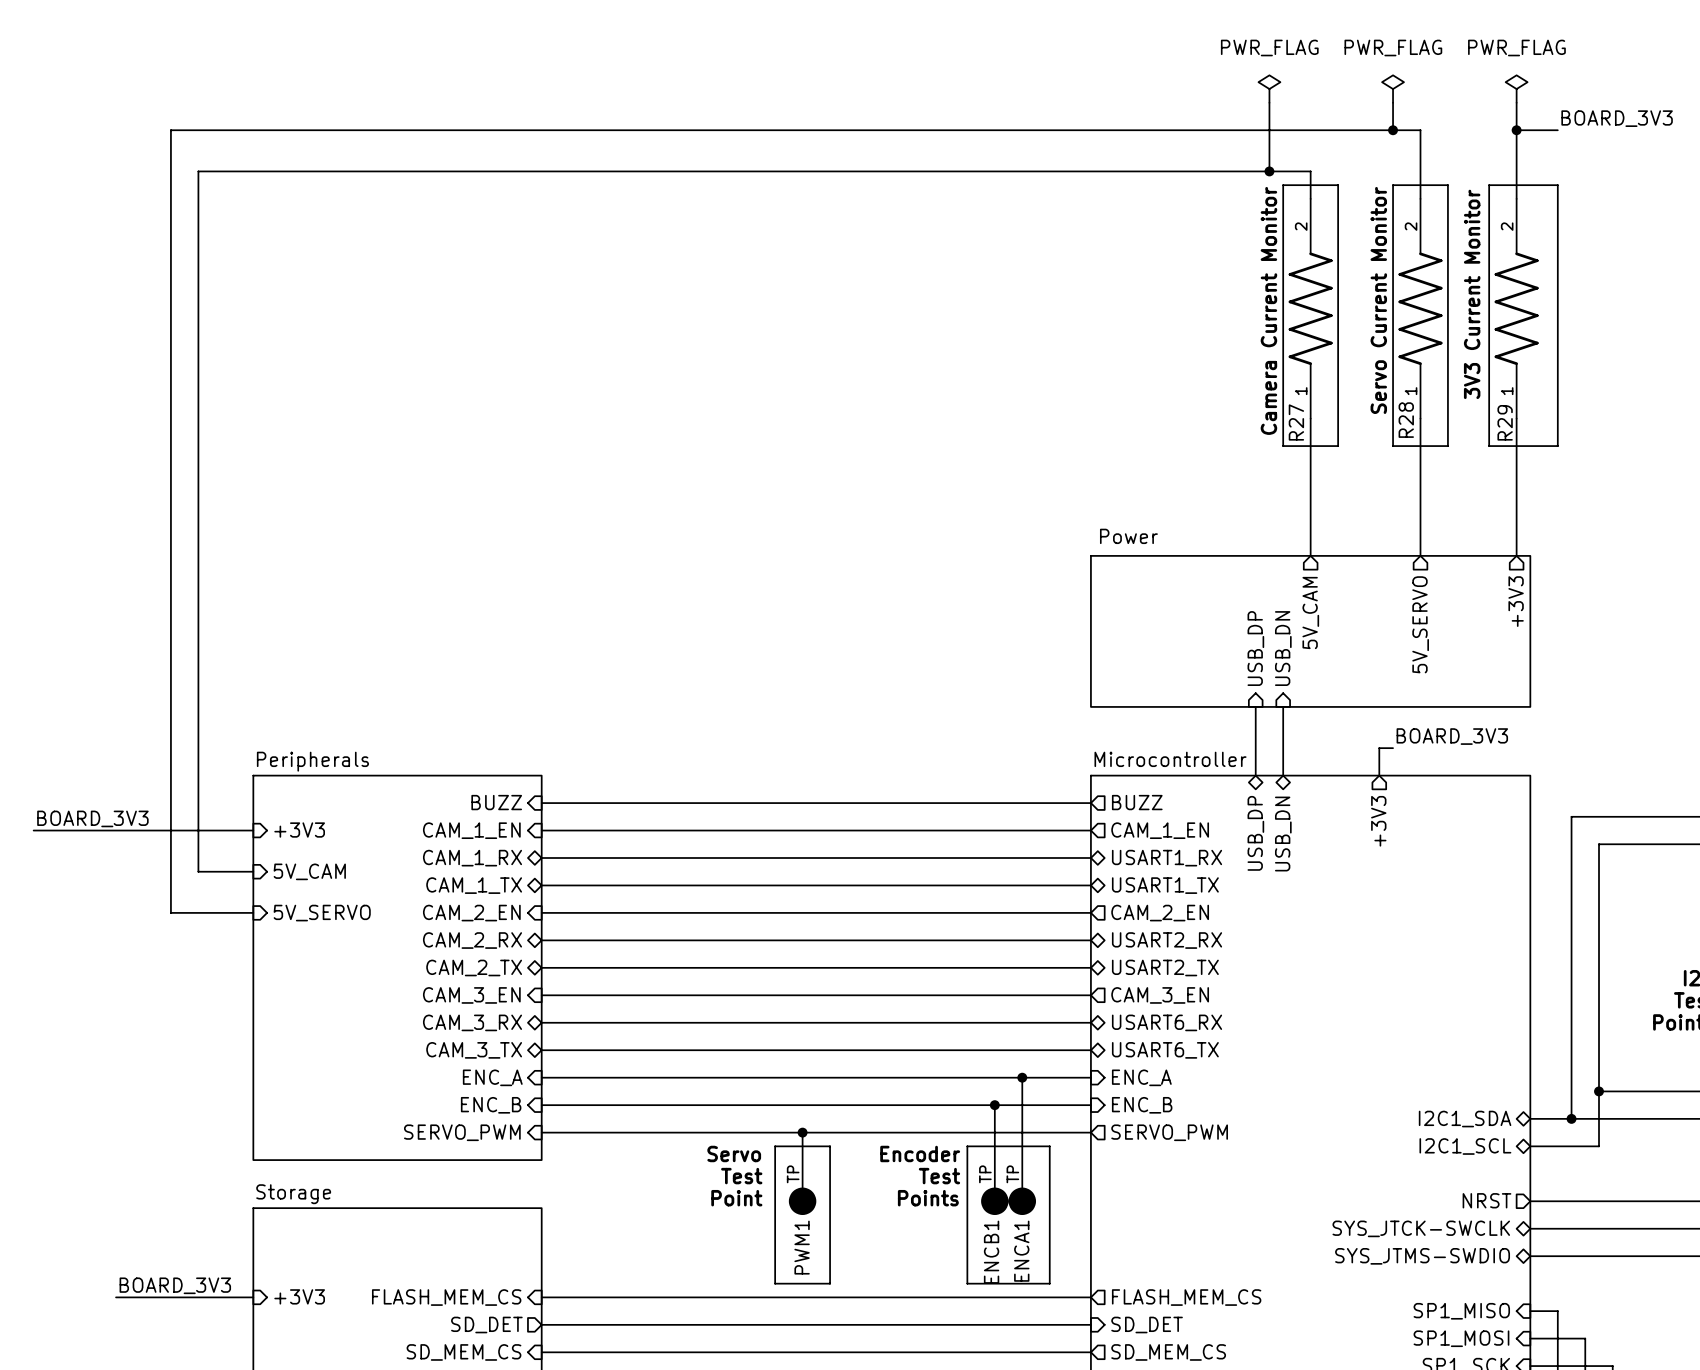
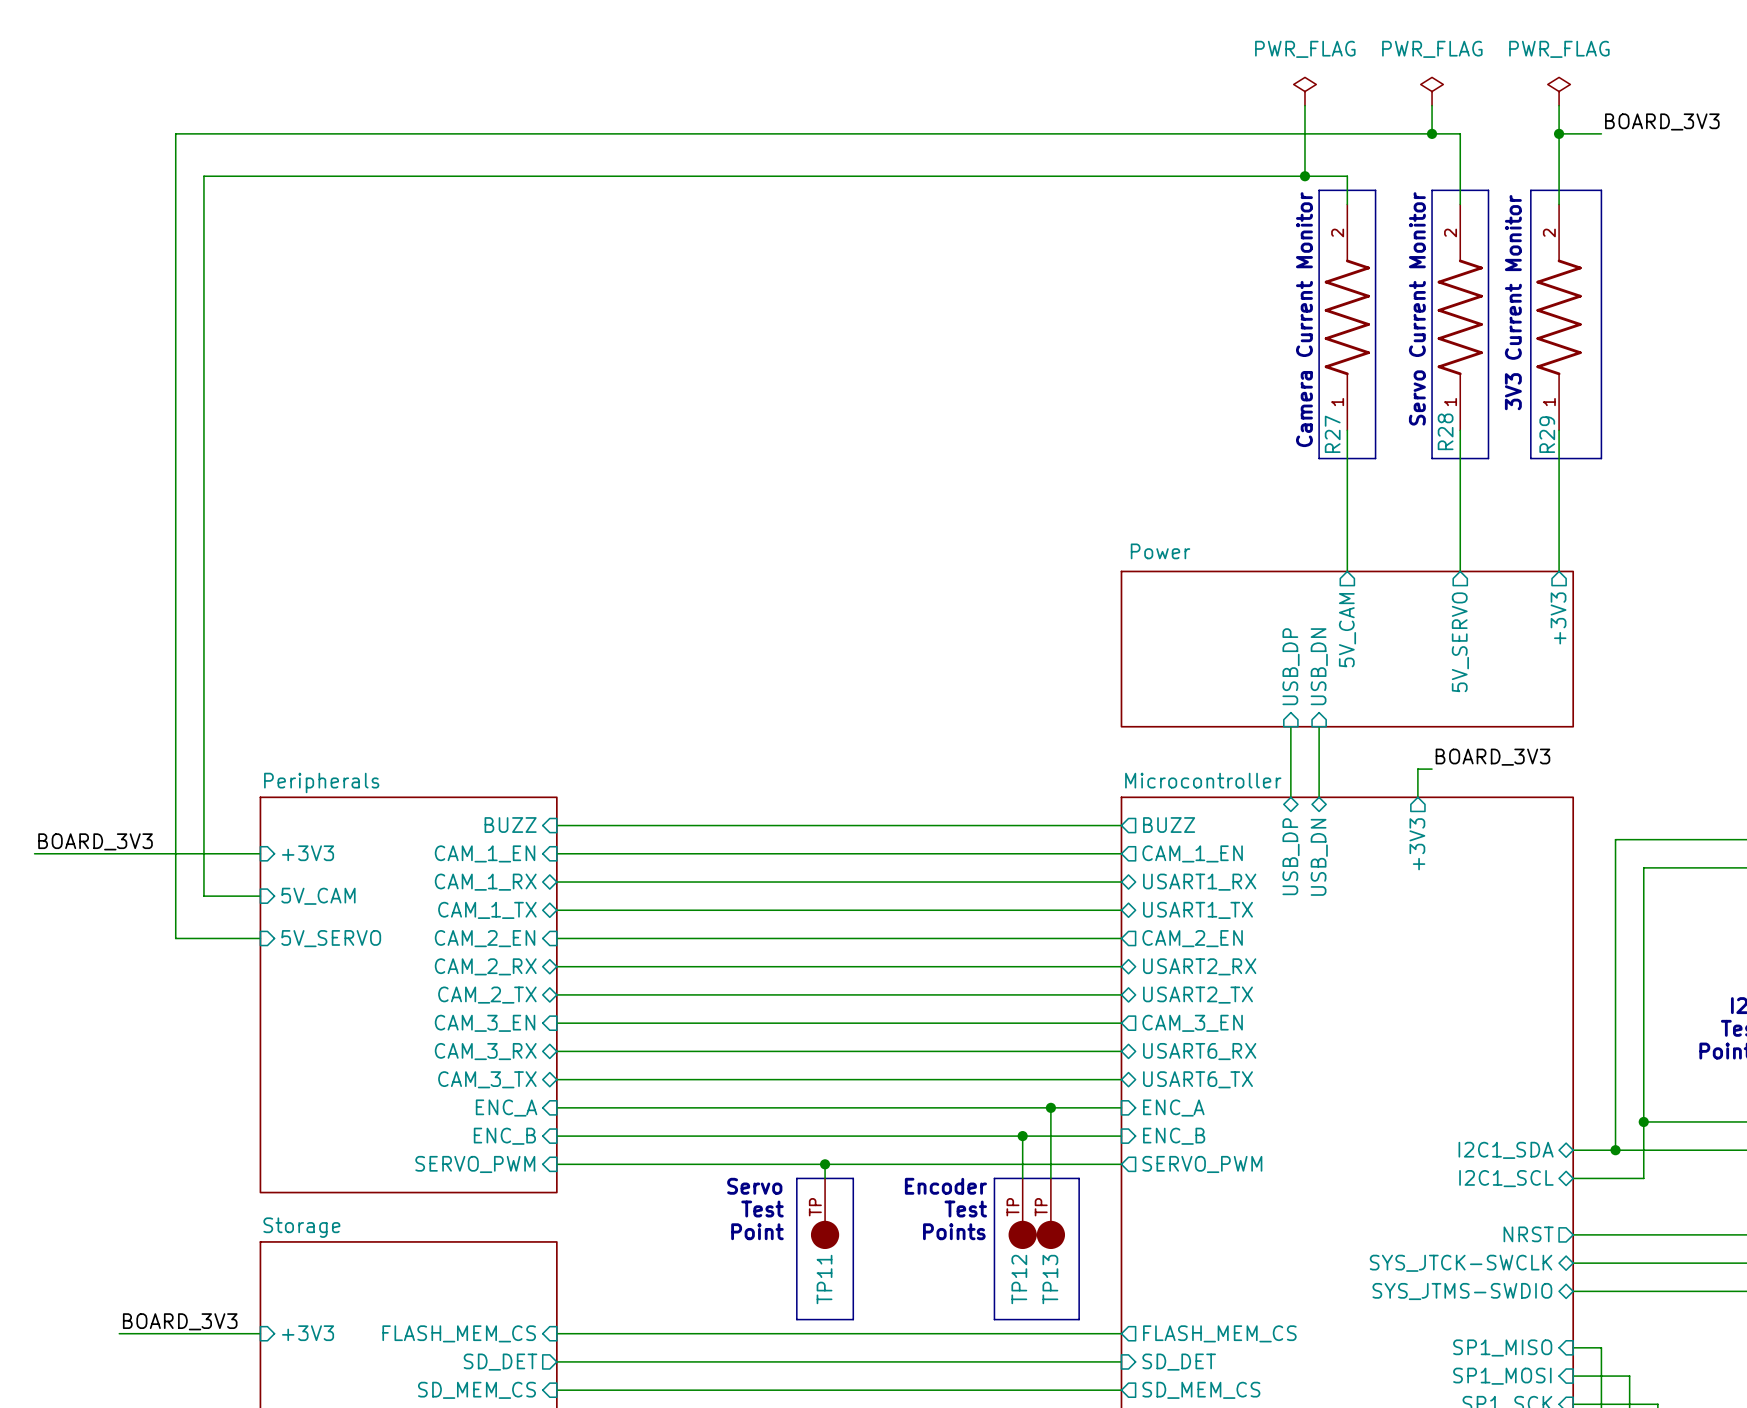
PWM1 name: PWM1 (802, 1247) -> TP11 (824, 1279)
ENCA1 name: ENCA1 (1021, 1251) -> TP13 (1050, 1279)
ENCB1 name: ENCB1 (991, 1252) -> TP12 (1019, 1279)

